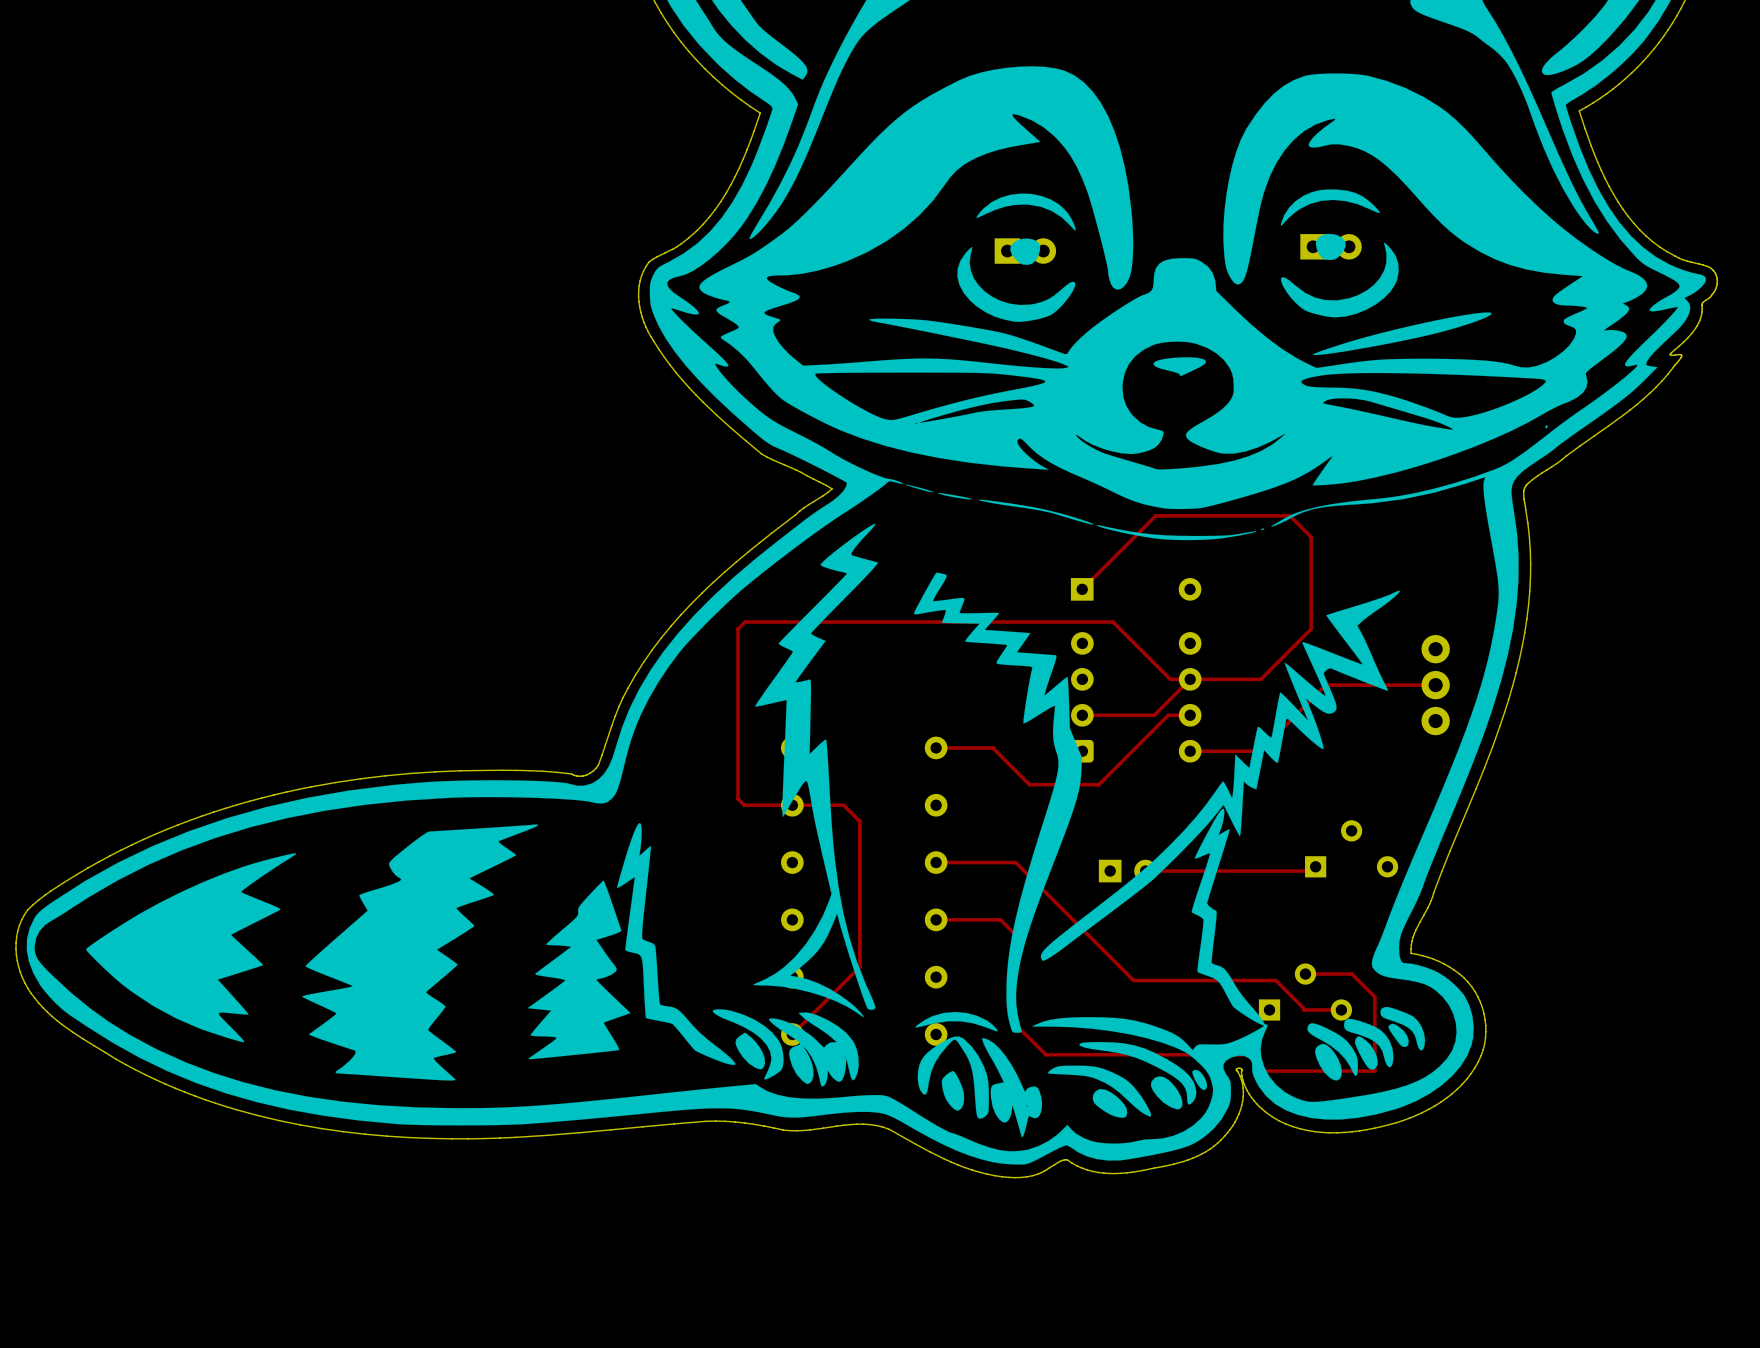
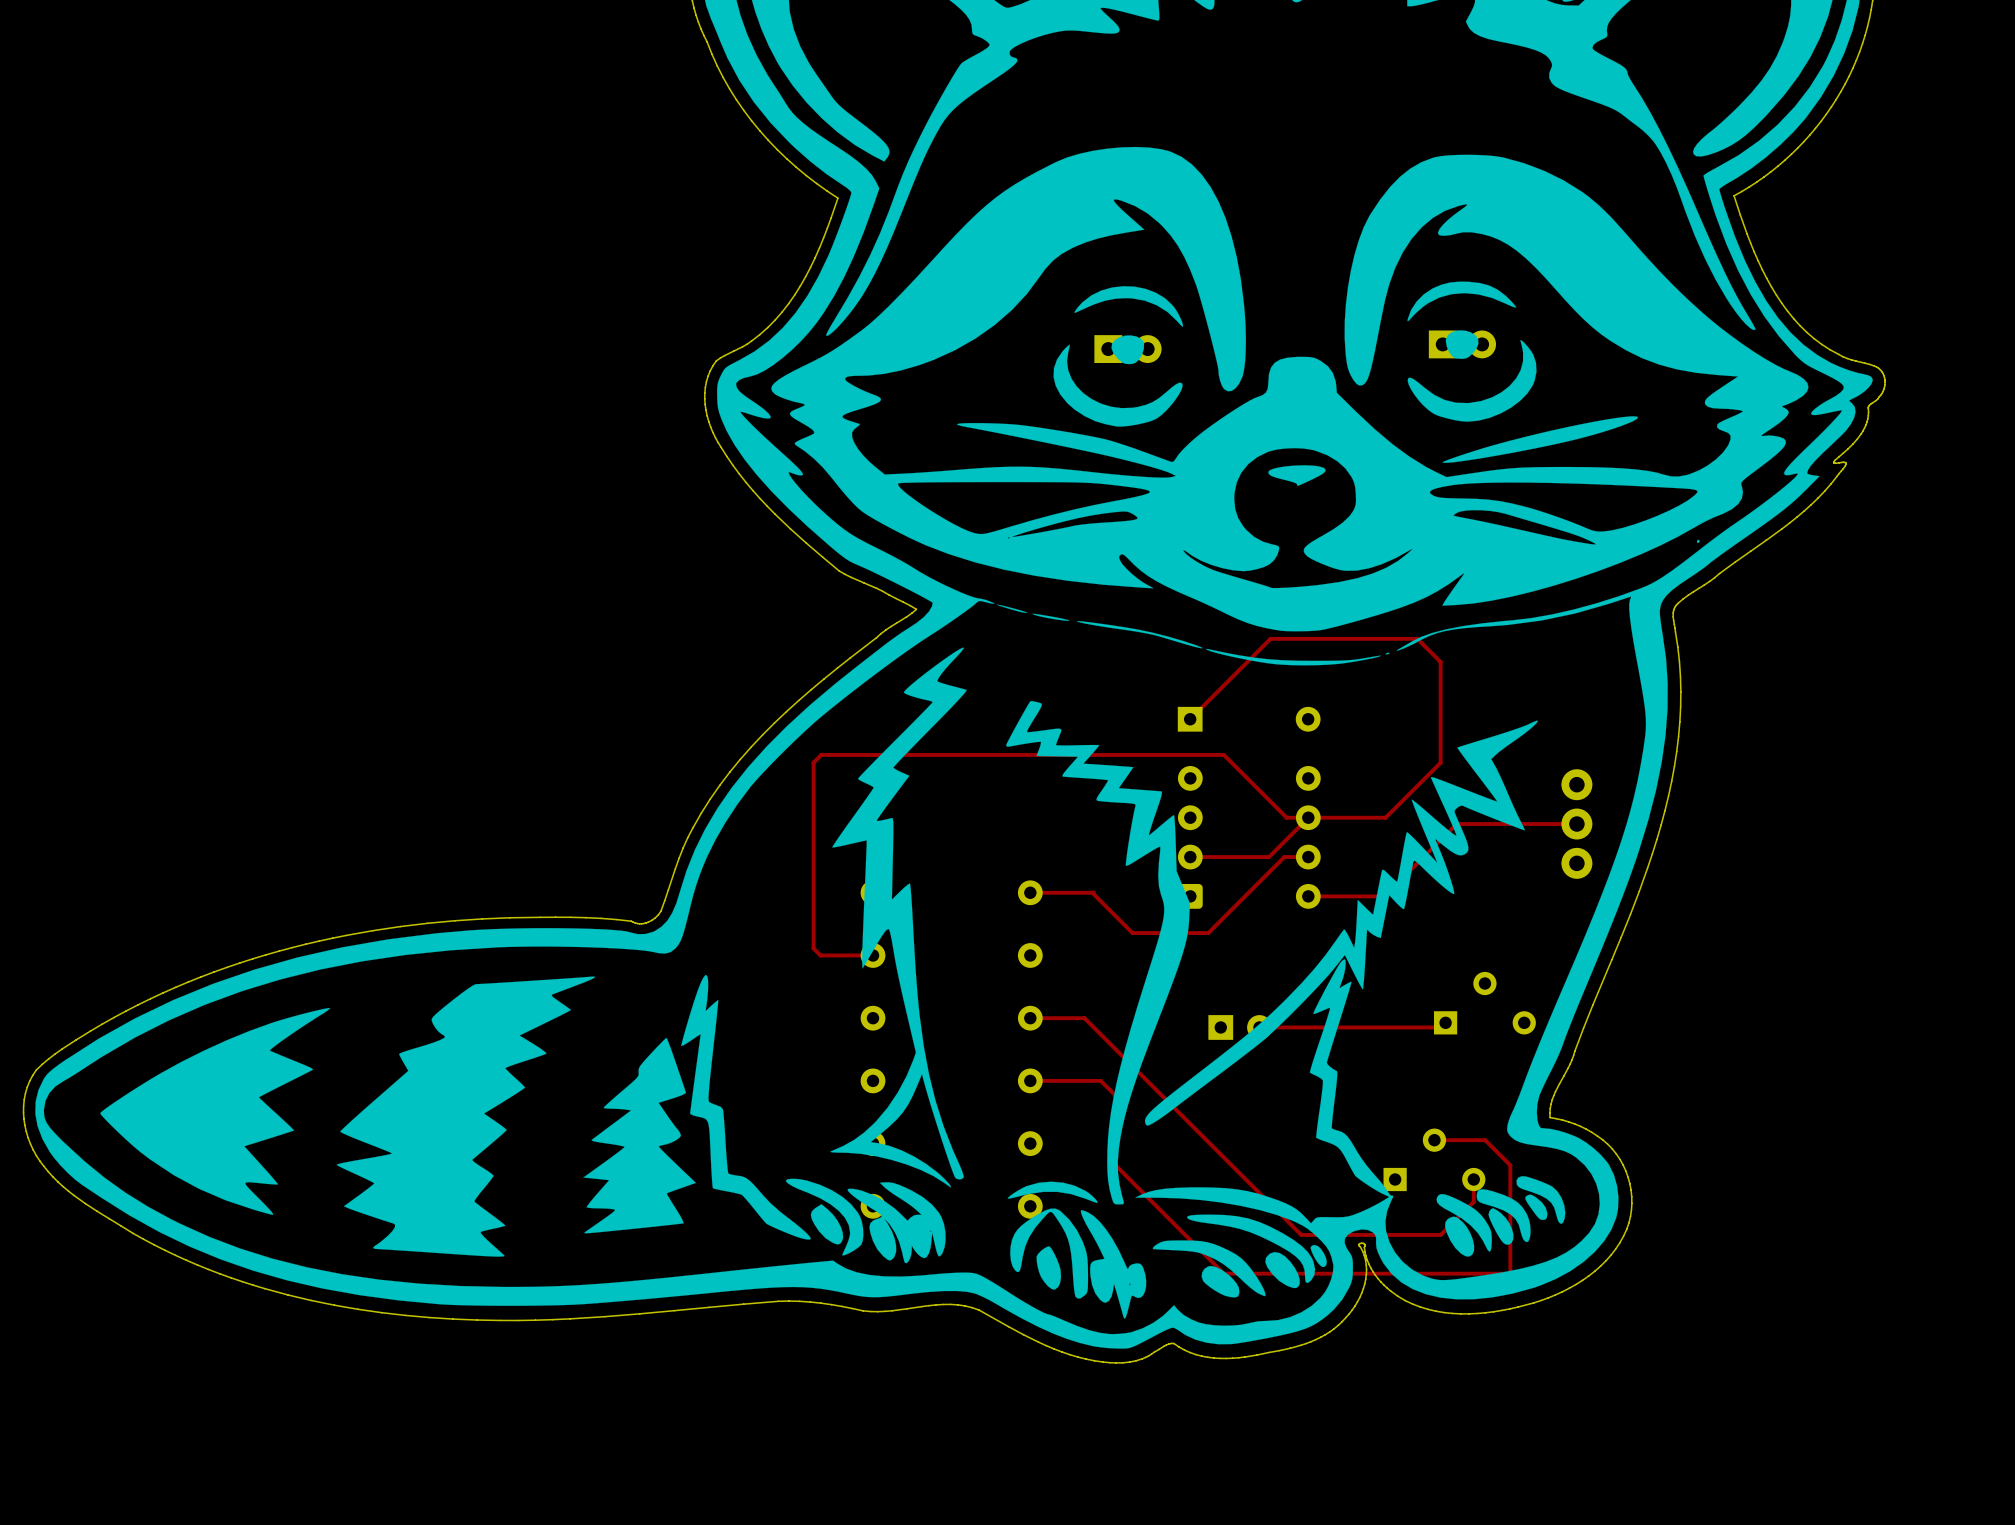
track: (792, 805) (843, 805) (859, 820) (859, 967) (792, 1034) -> none
track: (985, 862) (1015, 862) (1133, 980) (1275, 980) (1304, 1010) (1341, 1009) -> (1084, 1018) (1301, 1234) (1440, 1234) (1473, 1201) (1473, 1179)
track: (1013, 996) (1013, 1022) (1045, 1054) (1247, 1054) (1263, 1071) (1374, 1070) -> (1115, 1165) (1223, 1273) (1510, 1273) (1510, 1245)

